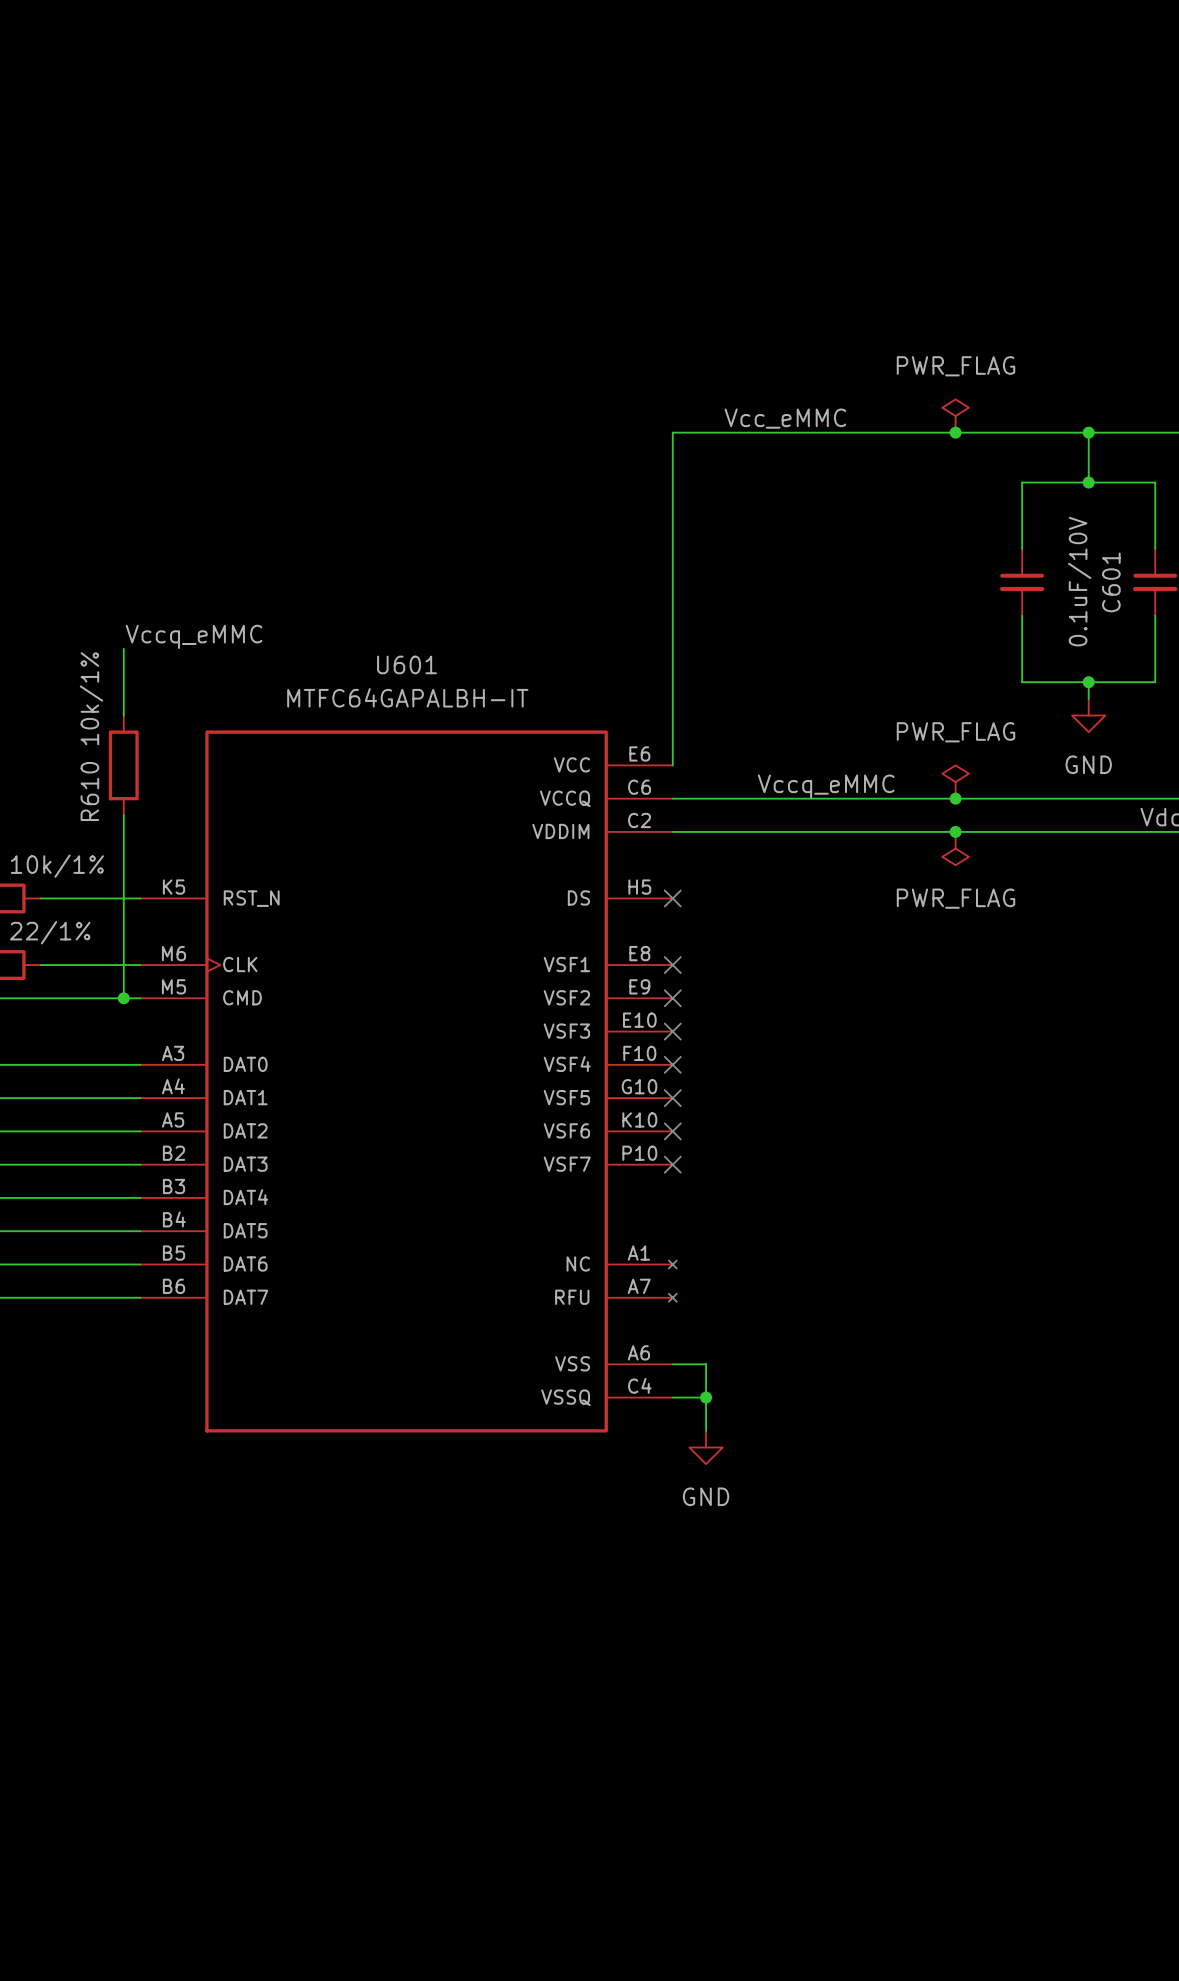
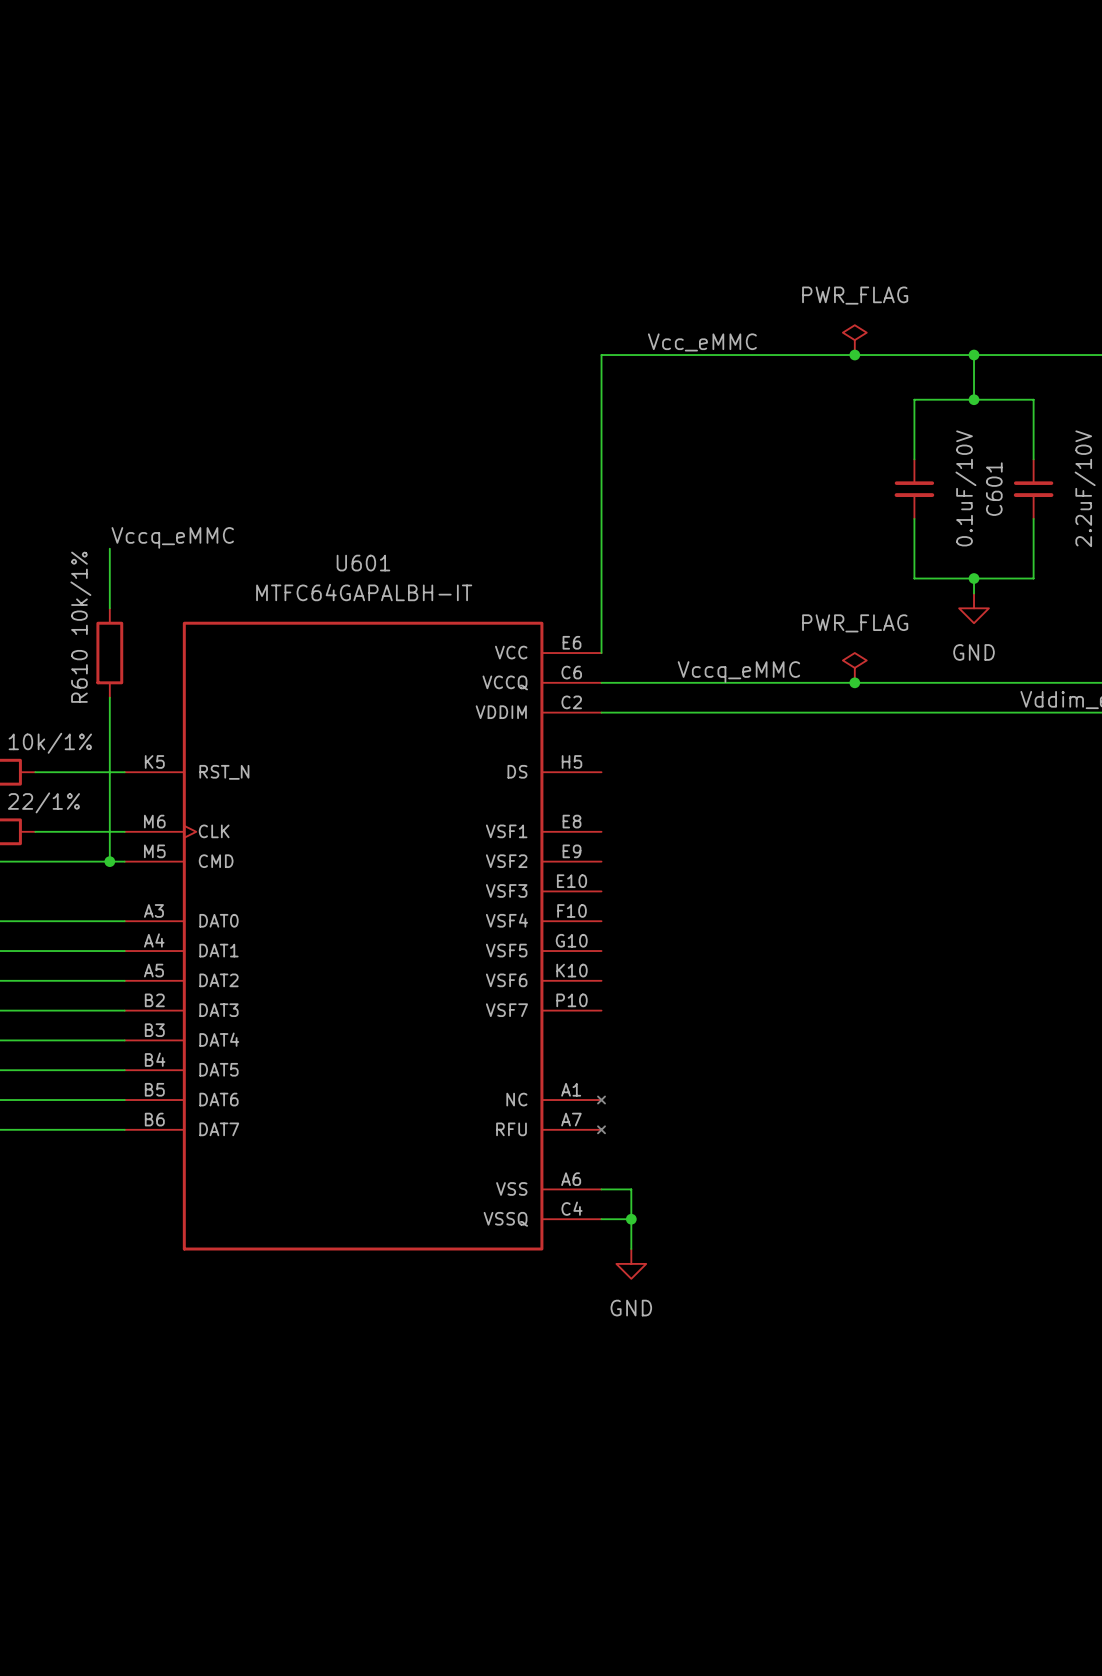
junction: (955, 831) -> none
power symbol: PWR_FLAG (955, 848) -> none
no-connect mark: (672, 898) -> none
no-connect mark: (672, 965) -> none
no-connect mark: (672, 998) -> none
no-connect mark: (672, 1031) -> none
no-connect mark: (672, 1064) -> none
no-connect mark: (672, 1098) -> none
no-connect mark: (672, 1131) -> none
no-connect mark: (672, 1164) -> none

